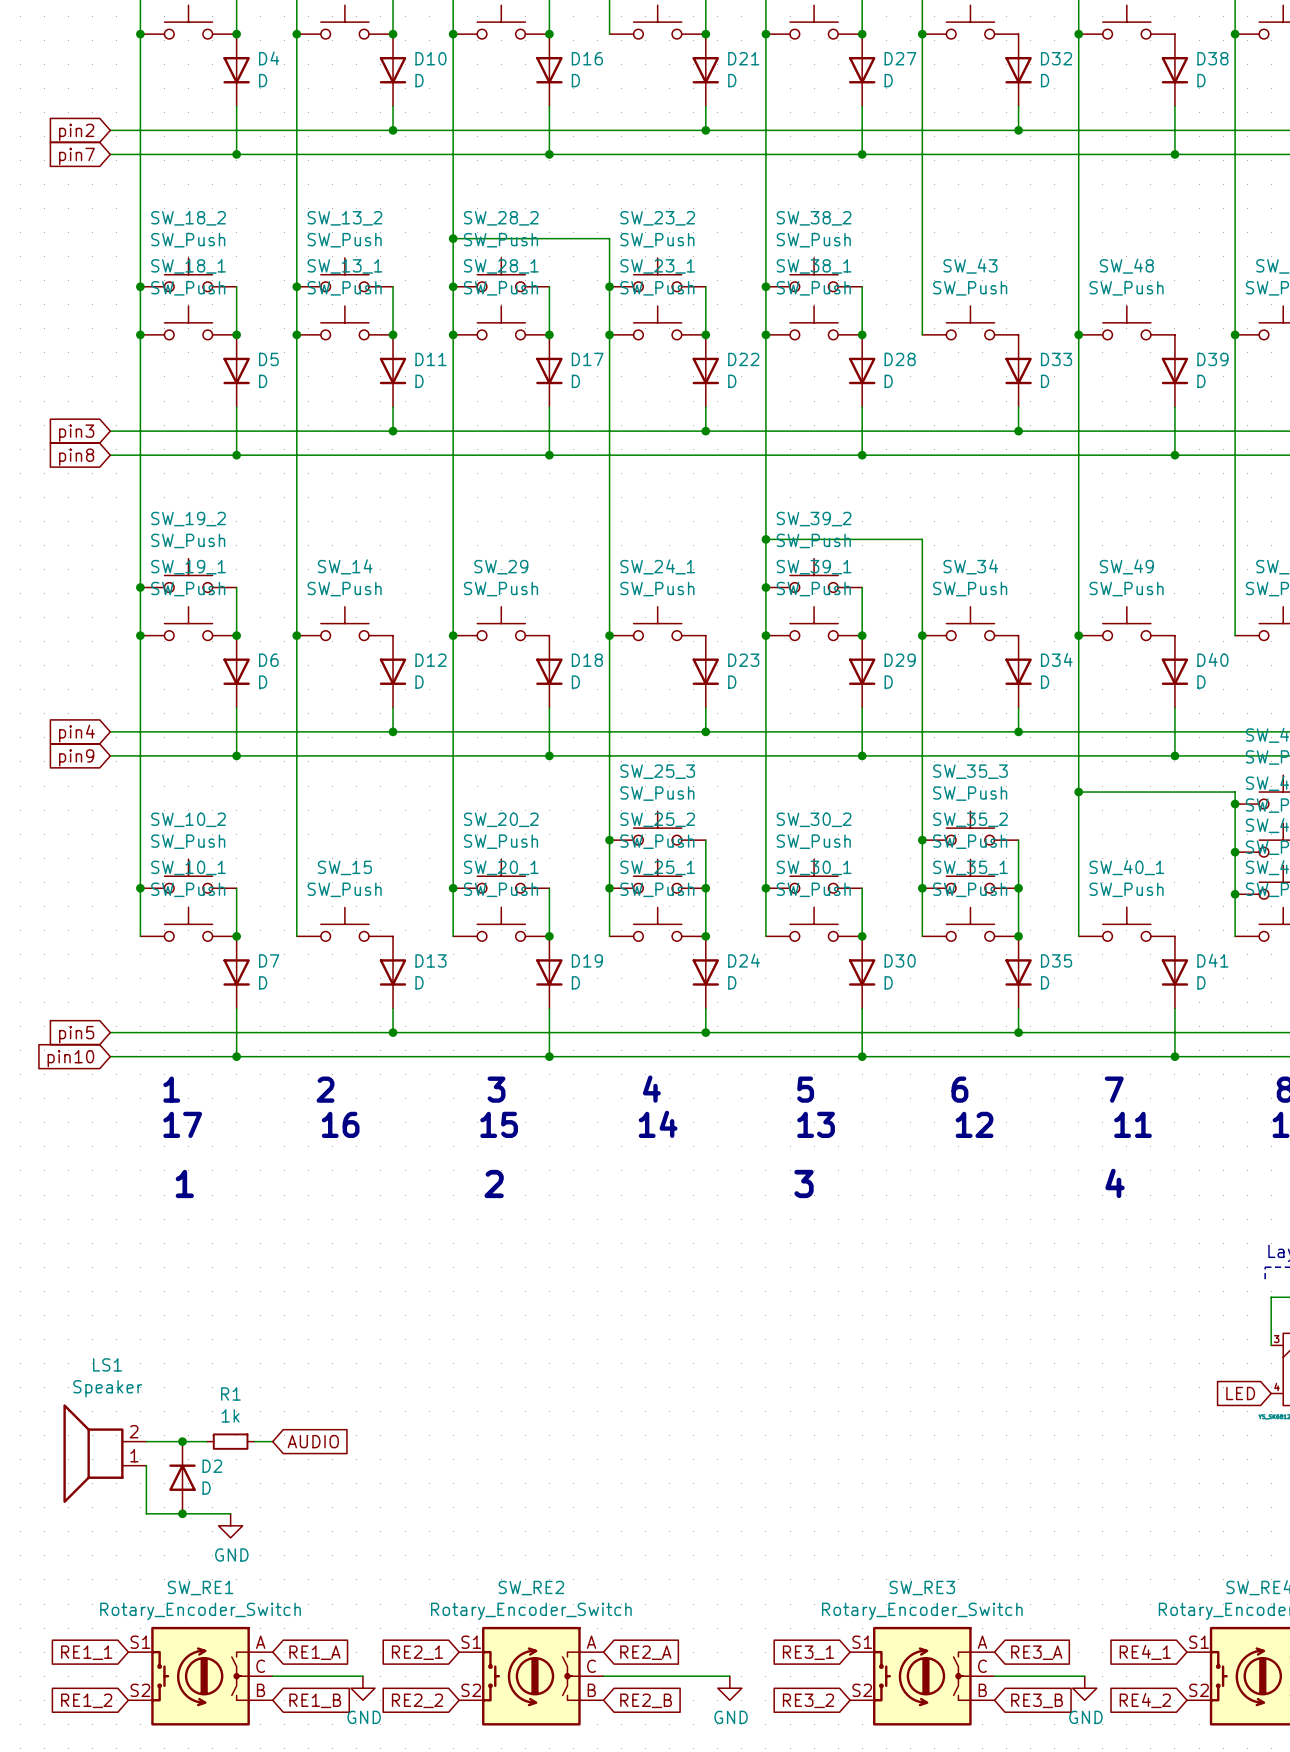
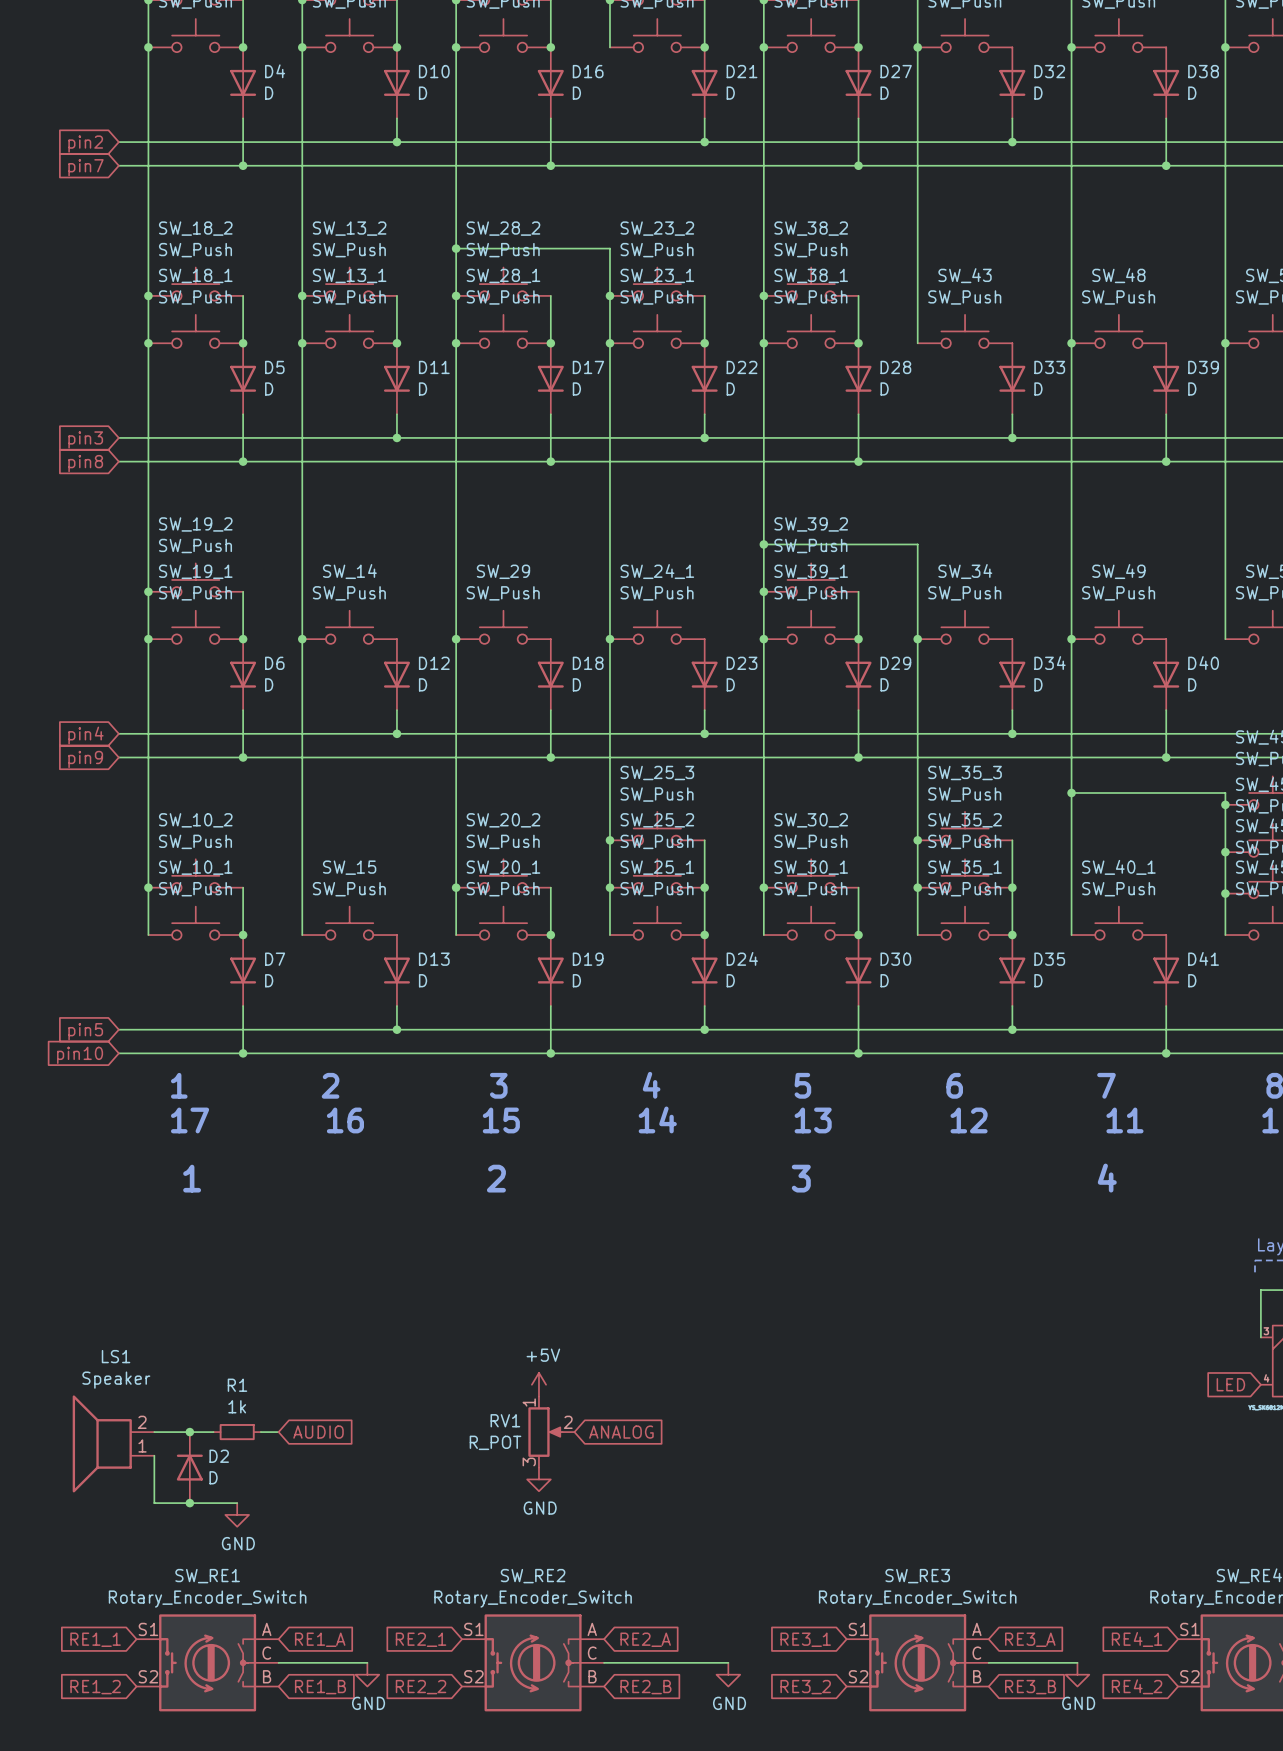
power symbol: none -> +5V (538, 1384)
RV1: none -> R_POT (551, 1432)
global label: none -> ANALOG (621, 1432)
power symbol: none -> GND (538, 1479)

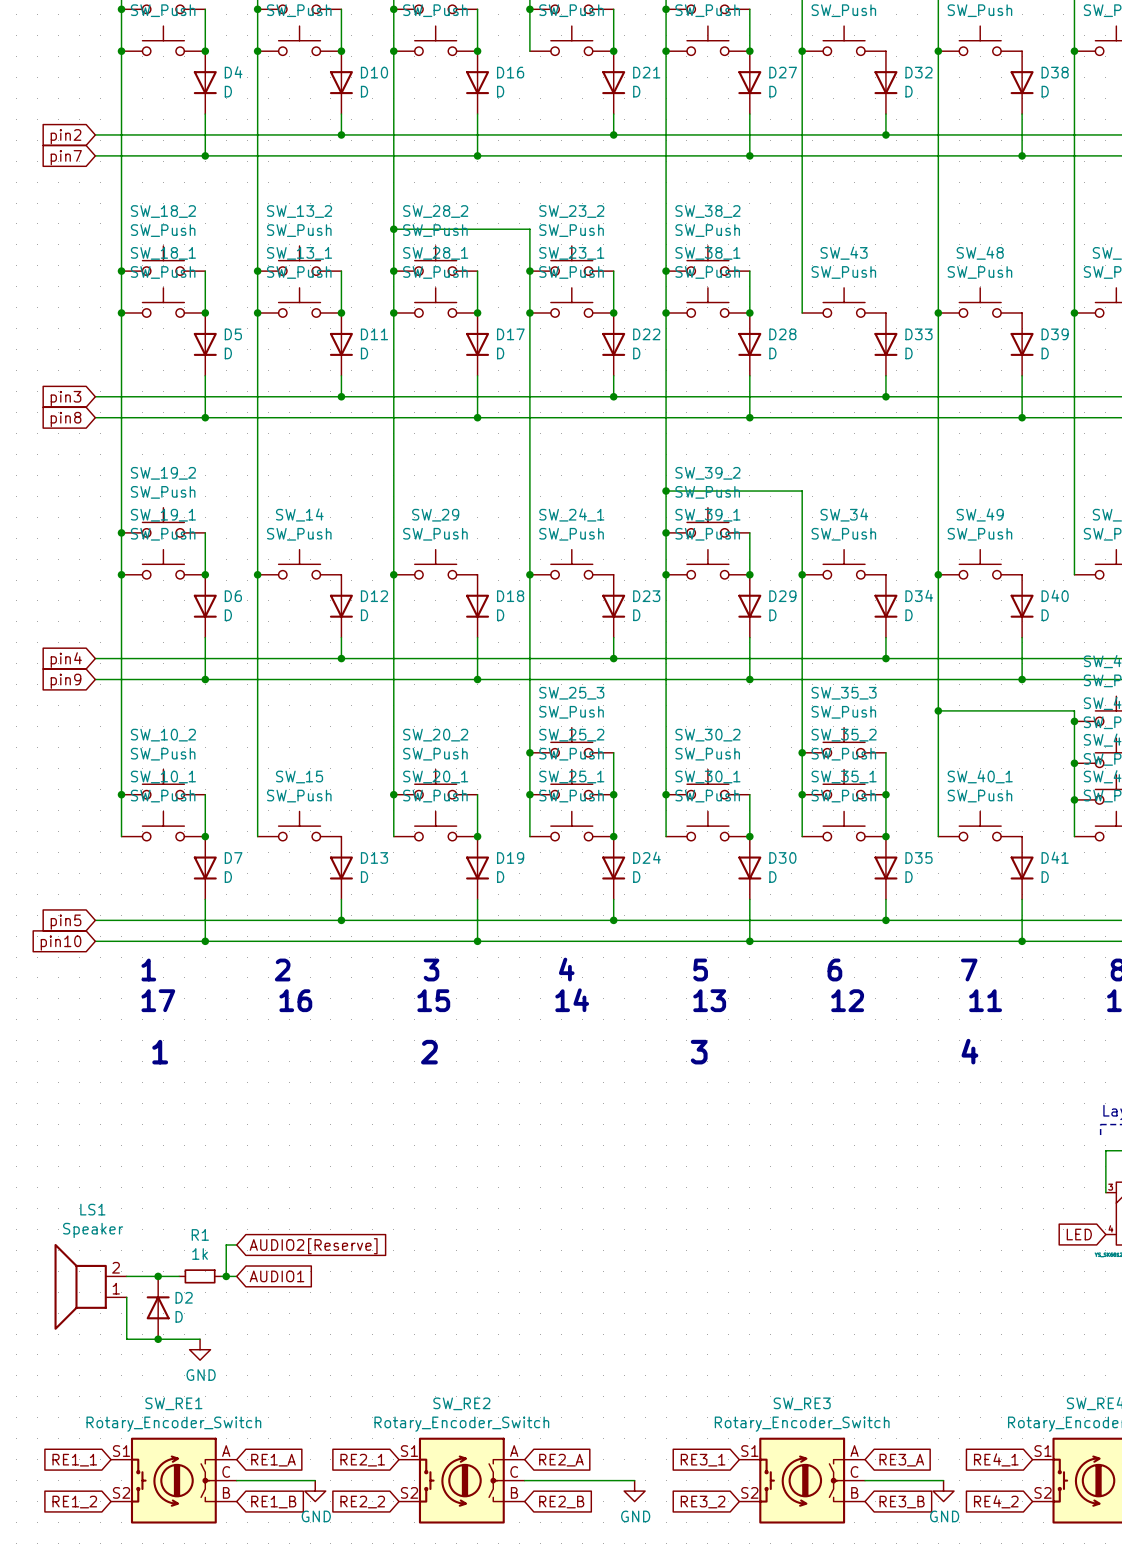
power symbol: +5V (538, 1384) -> none
wire: none -> (236, 1244) (226, 1244) (226, 1276)
global label: none -> AUDIO2[Reserve] (313, 1246)
junction: none -> (226, 1276)
global label: AUDIO (318, 1432) -> AUDIO1 (276, 1276)
RV1: R_POT (551, 1432) -> none
global label: ANALOG (621, 1432) -> none
power symbol: GND (538, 1479) -> none

